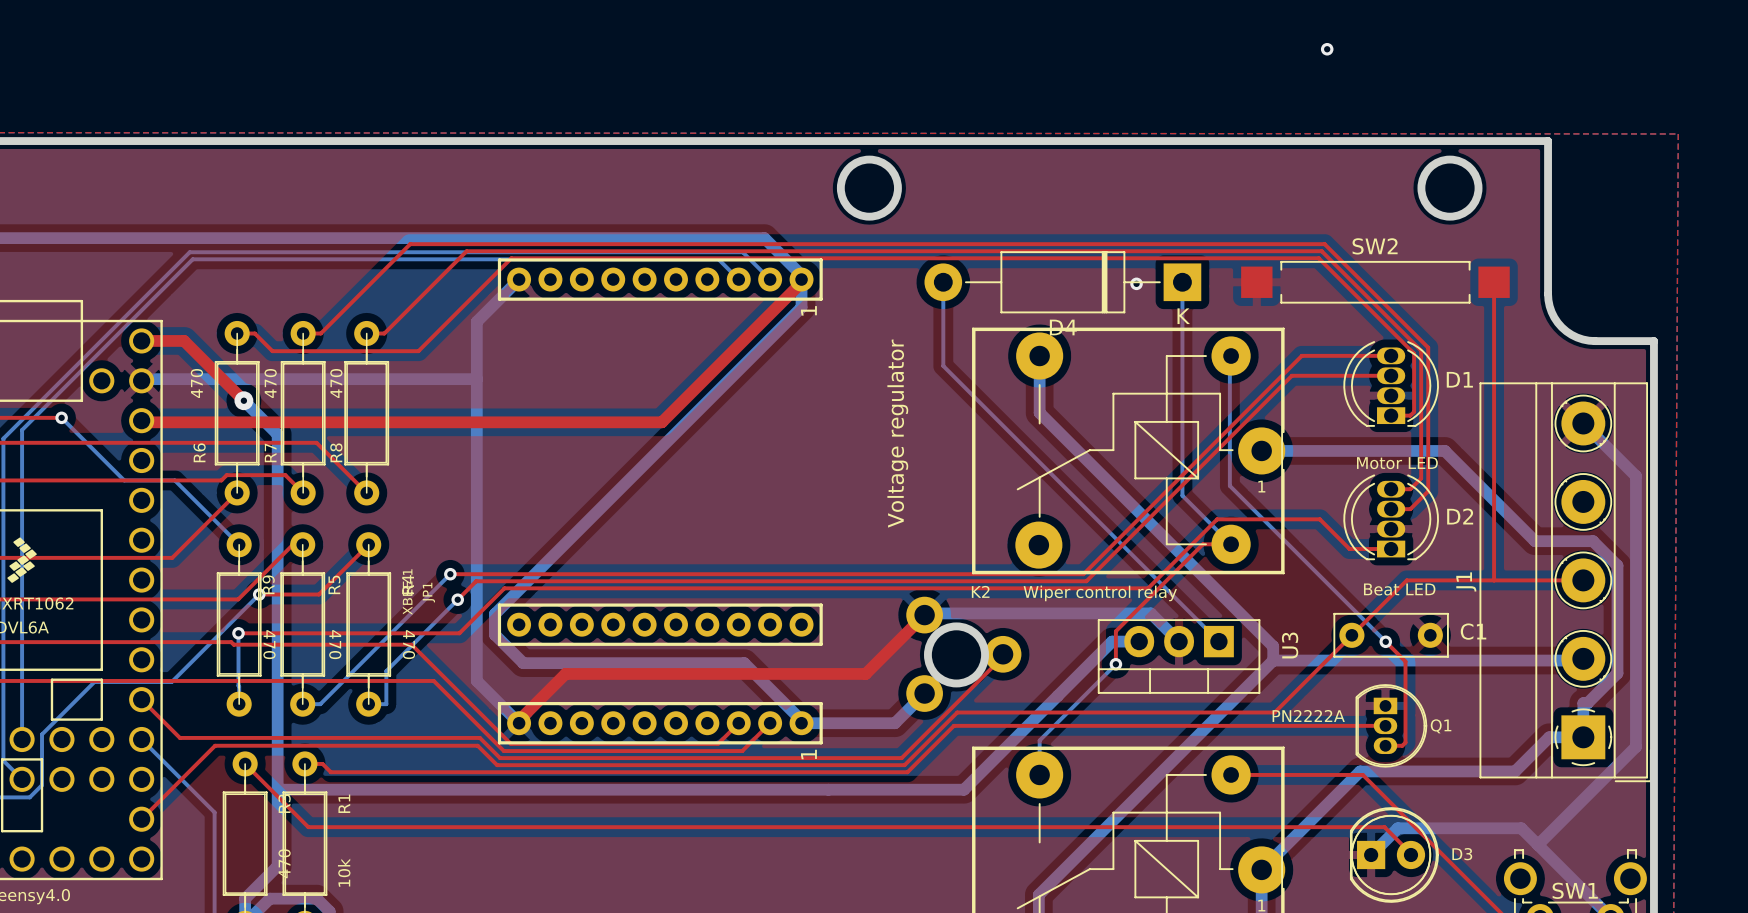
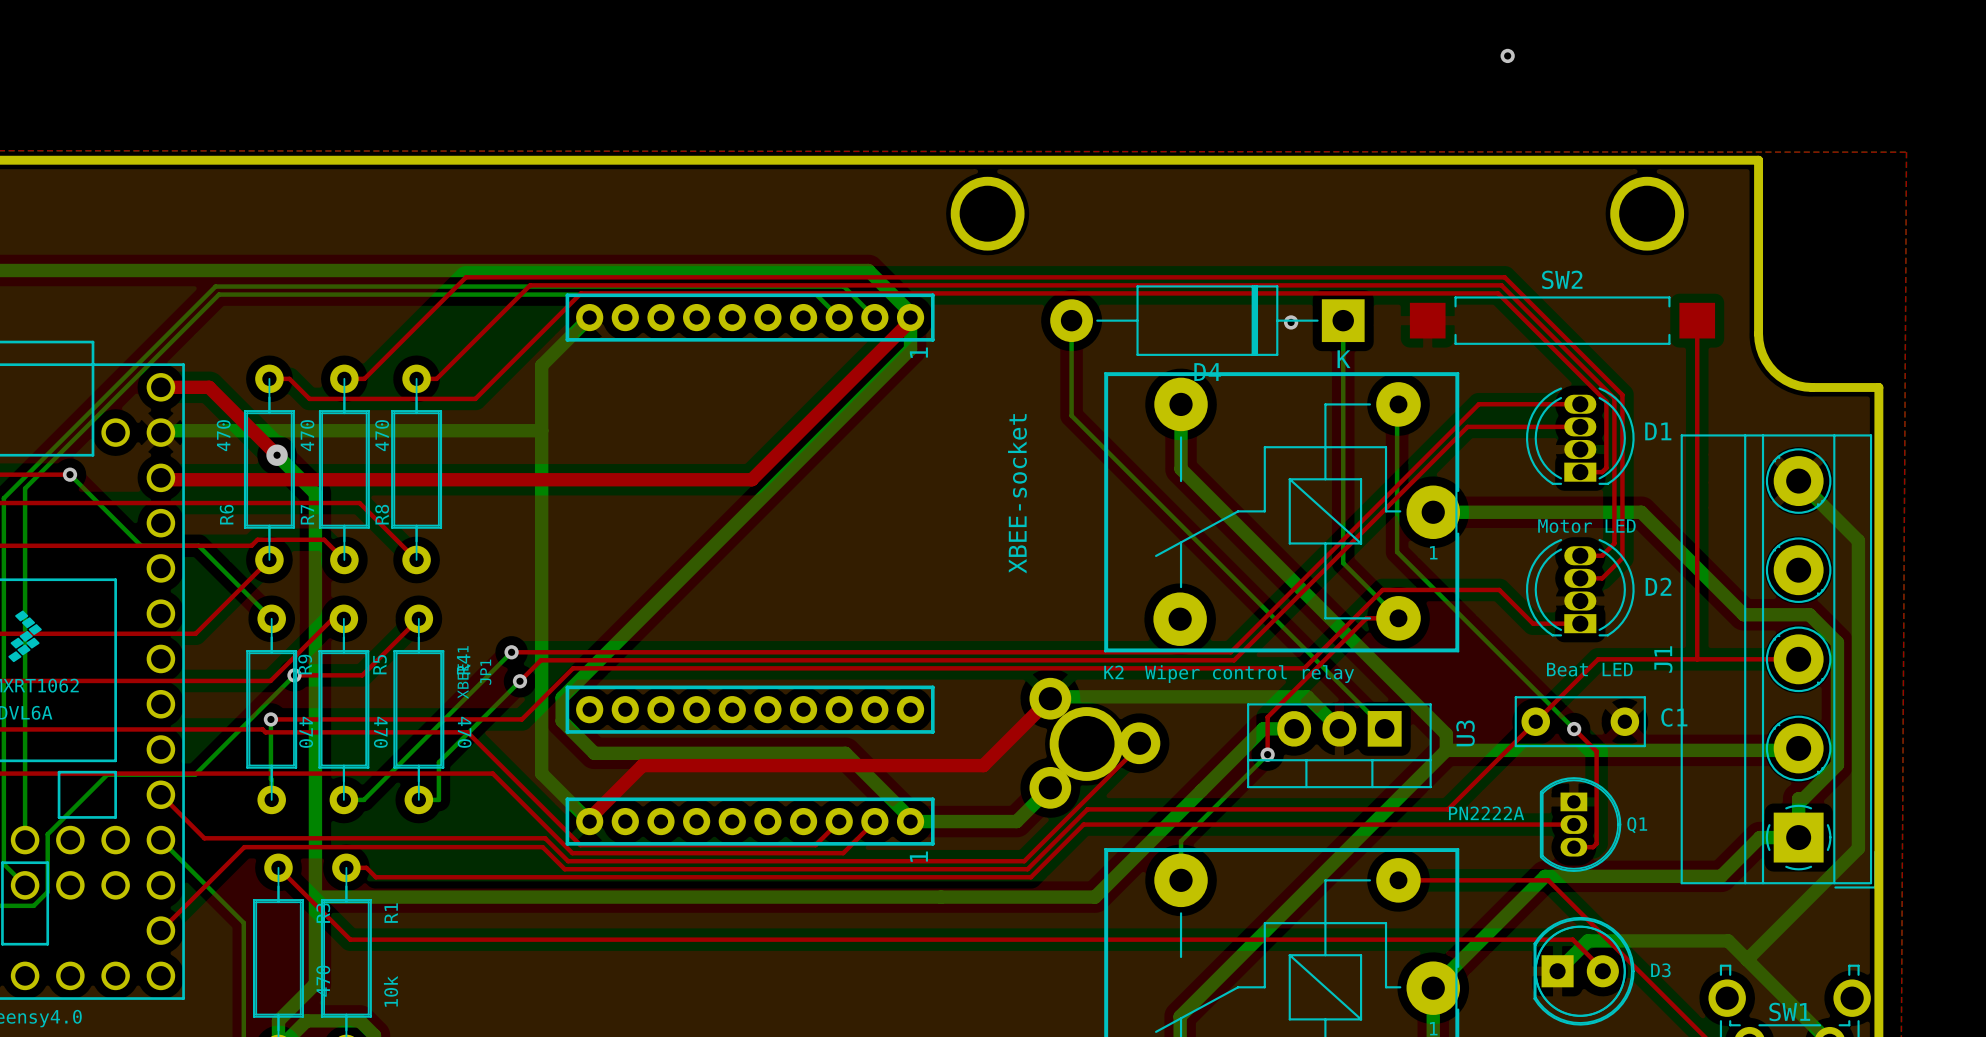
U3 value: Voltage regulator (897, 433) -> XBEE-socket (1017, 493)

